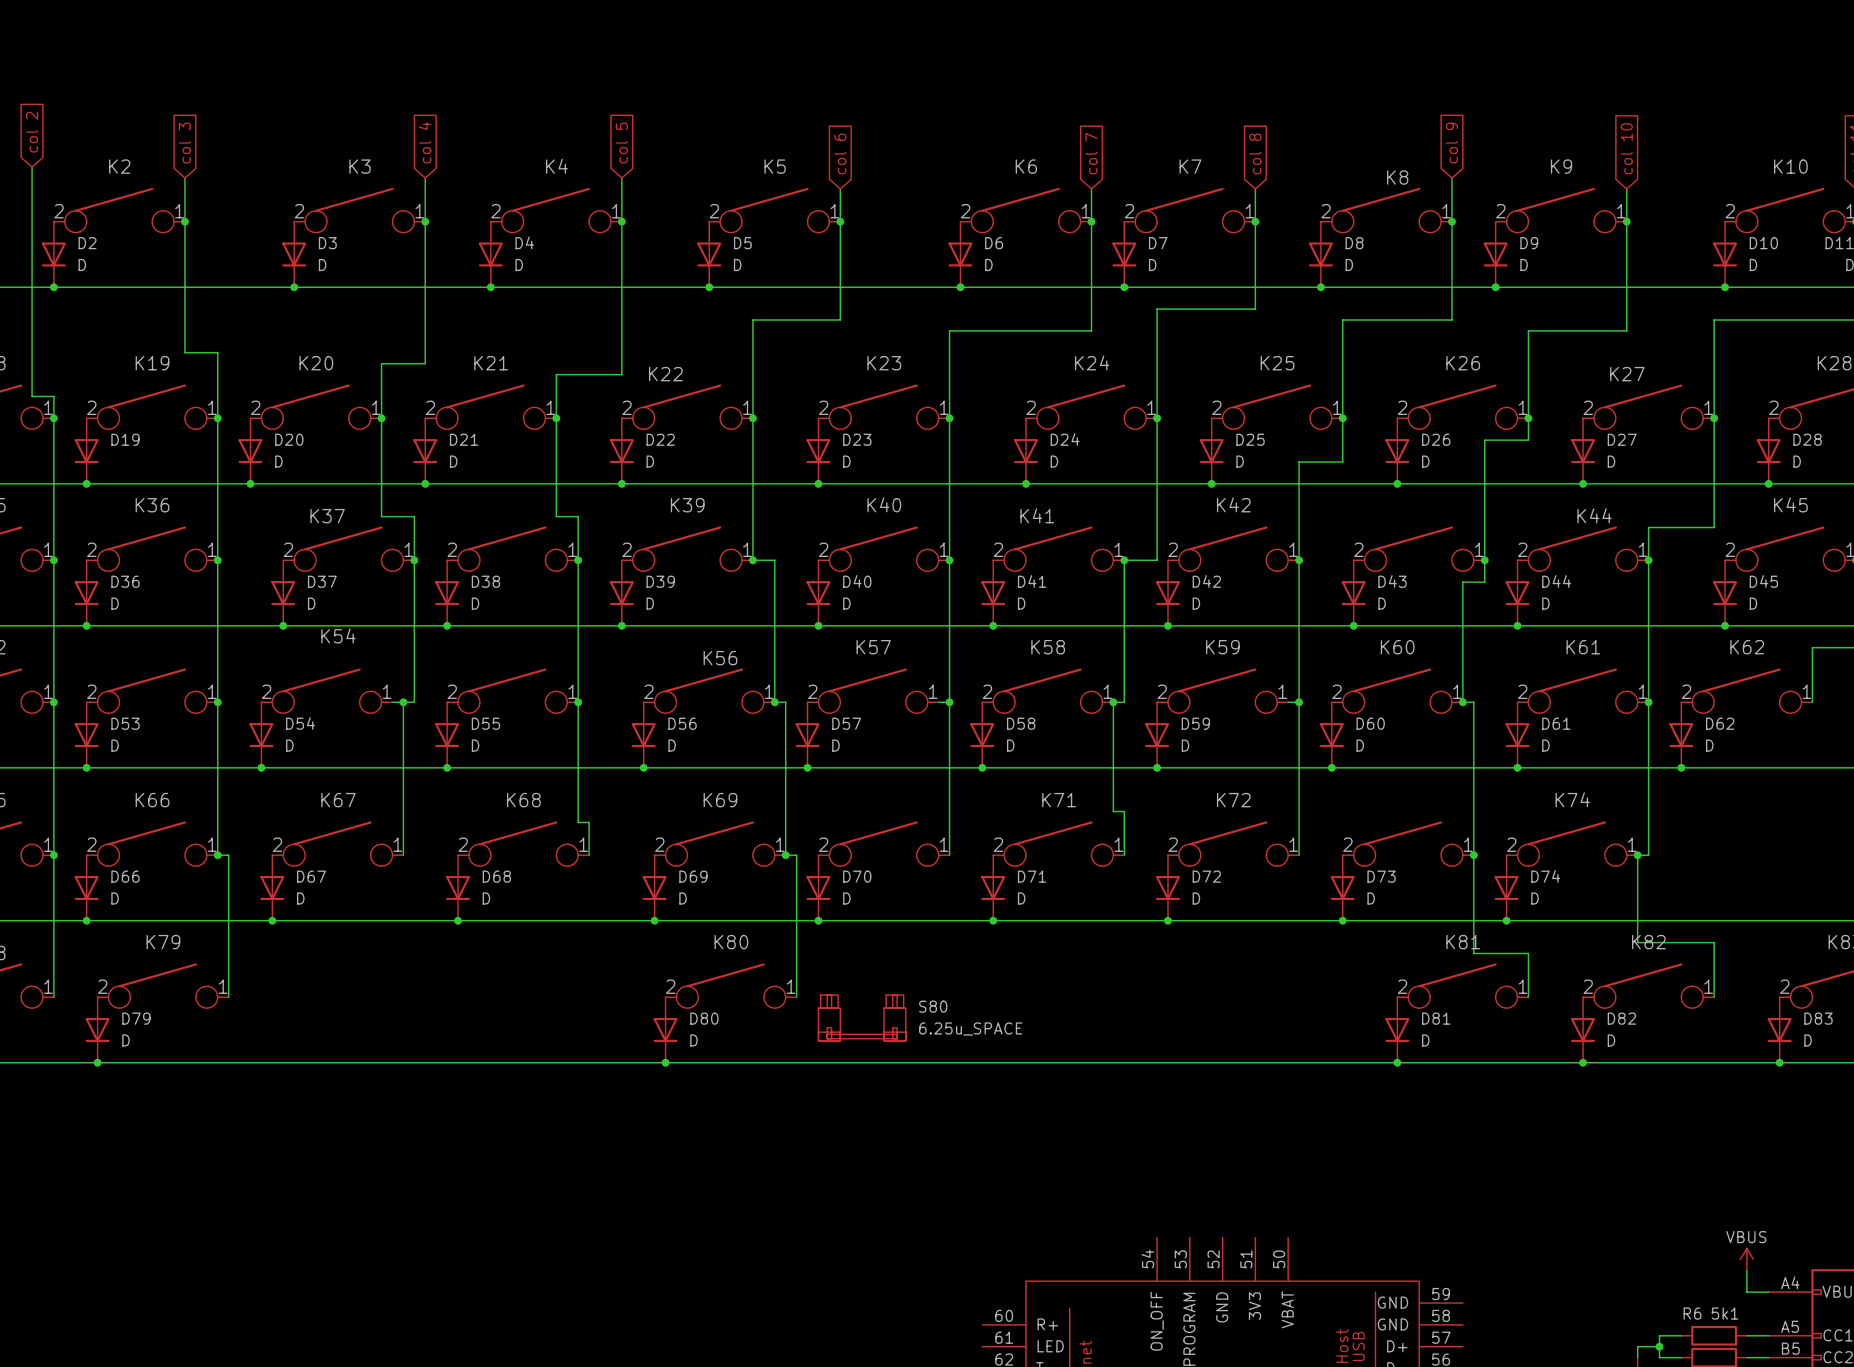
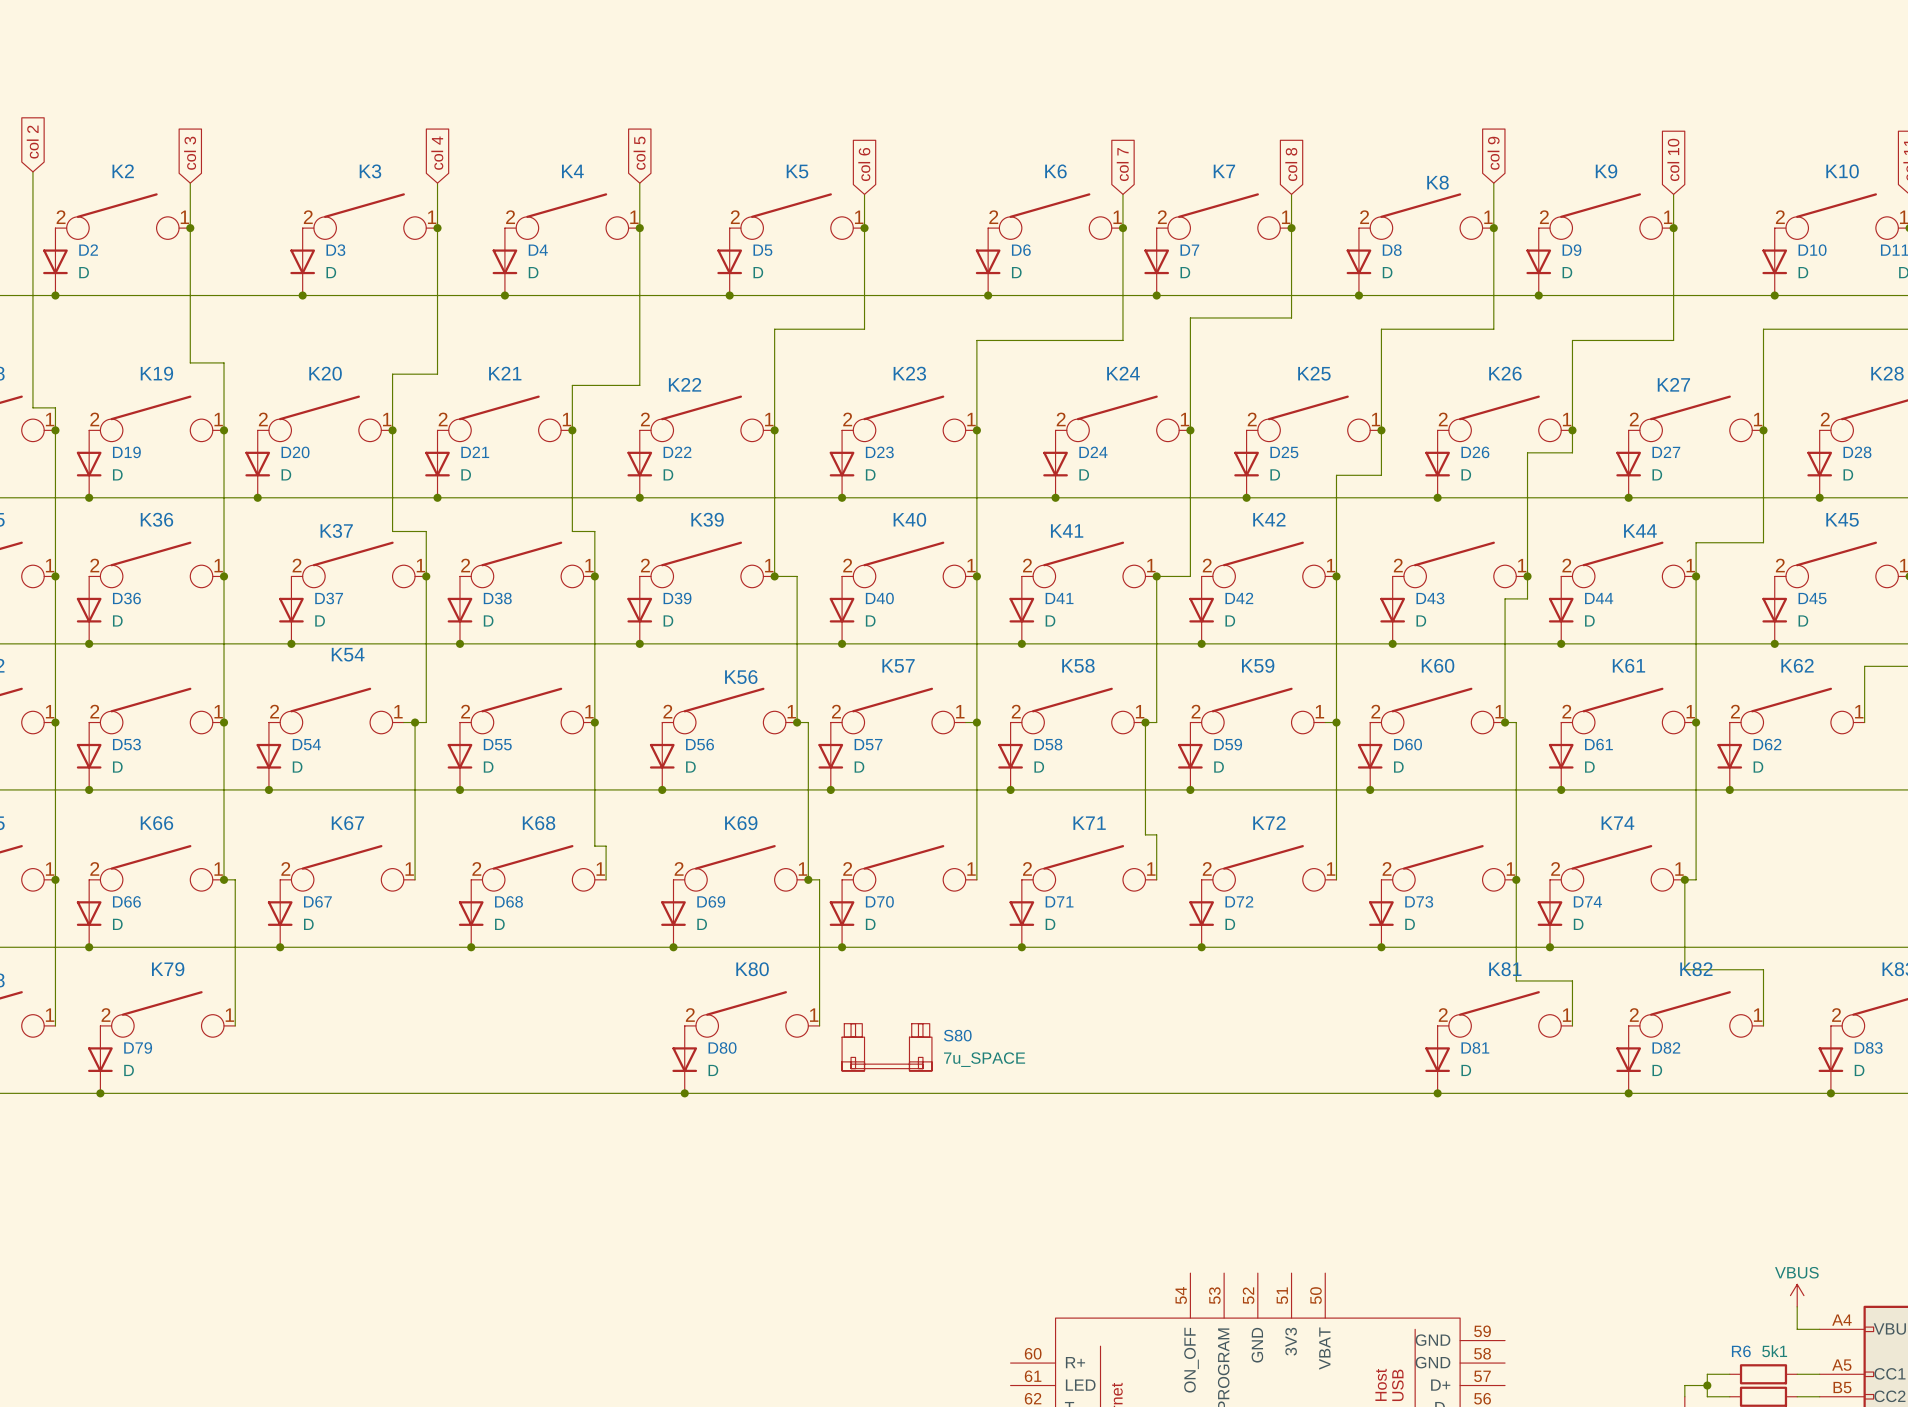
D19 value: none -> D (117, 474)
S80 value: 6.25u_SPACE (970, 1028) -> 7u_SPACE (984, 1059)

